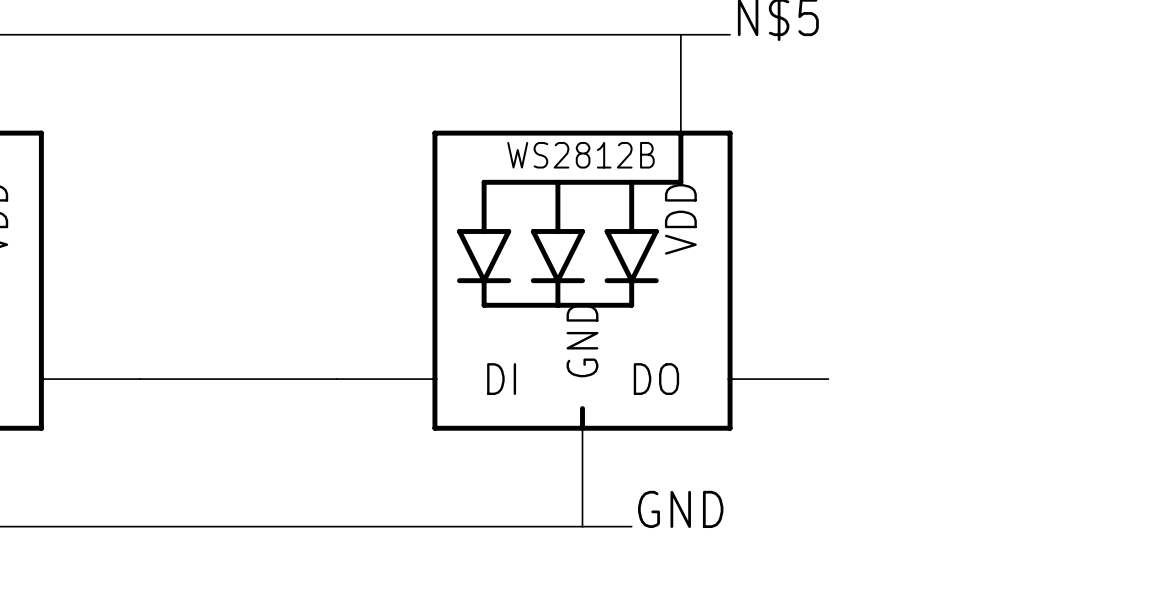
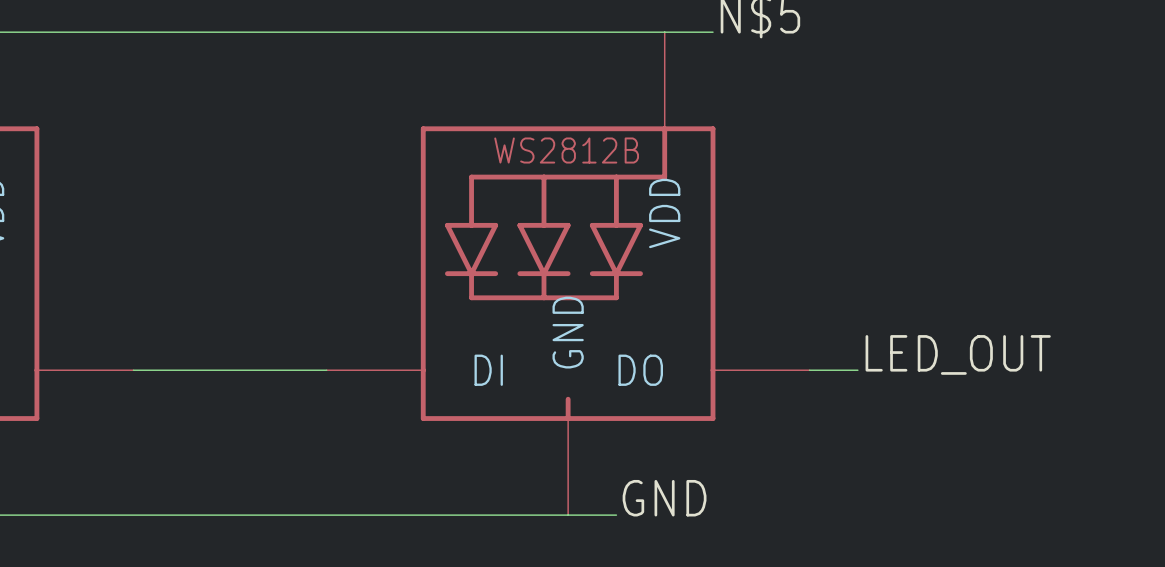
label: none -> LED_OUT (958, 354)
wire: none -> (809, 370) (857, 370)

